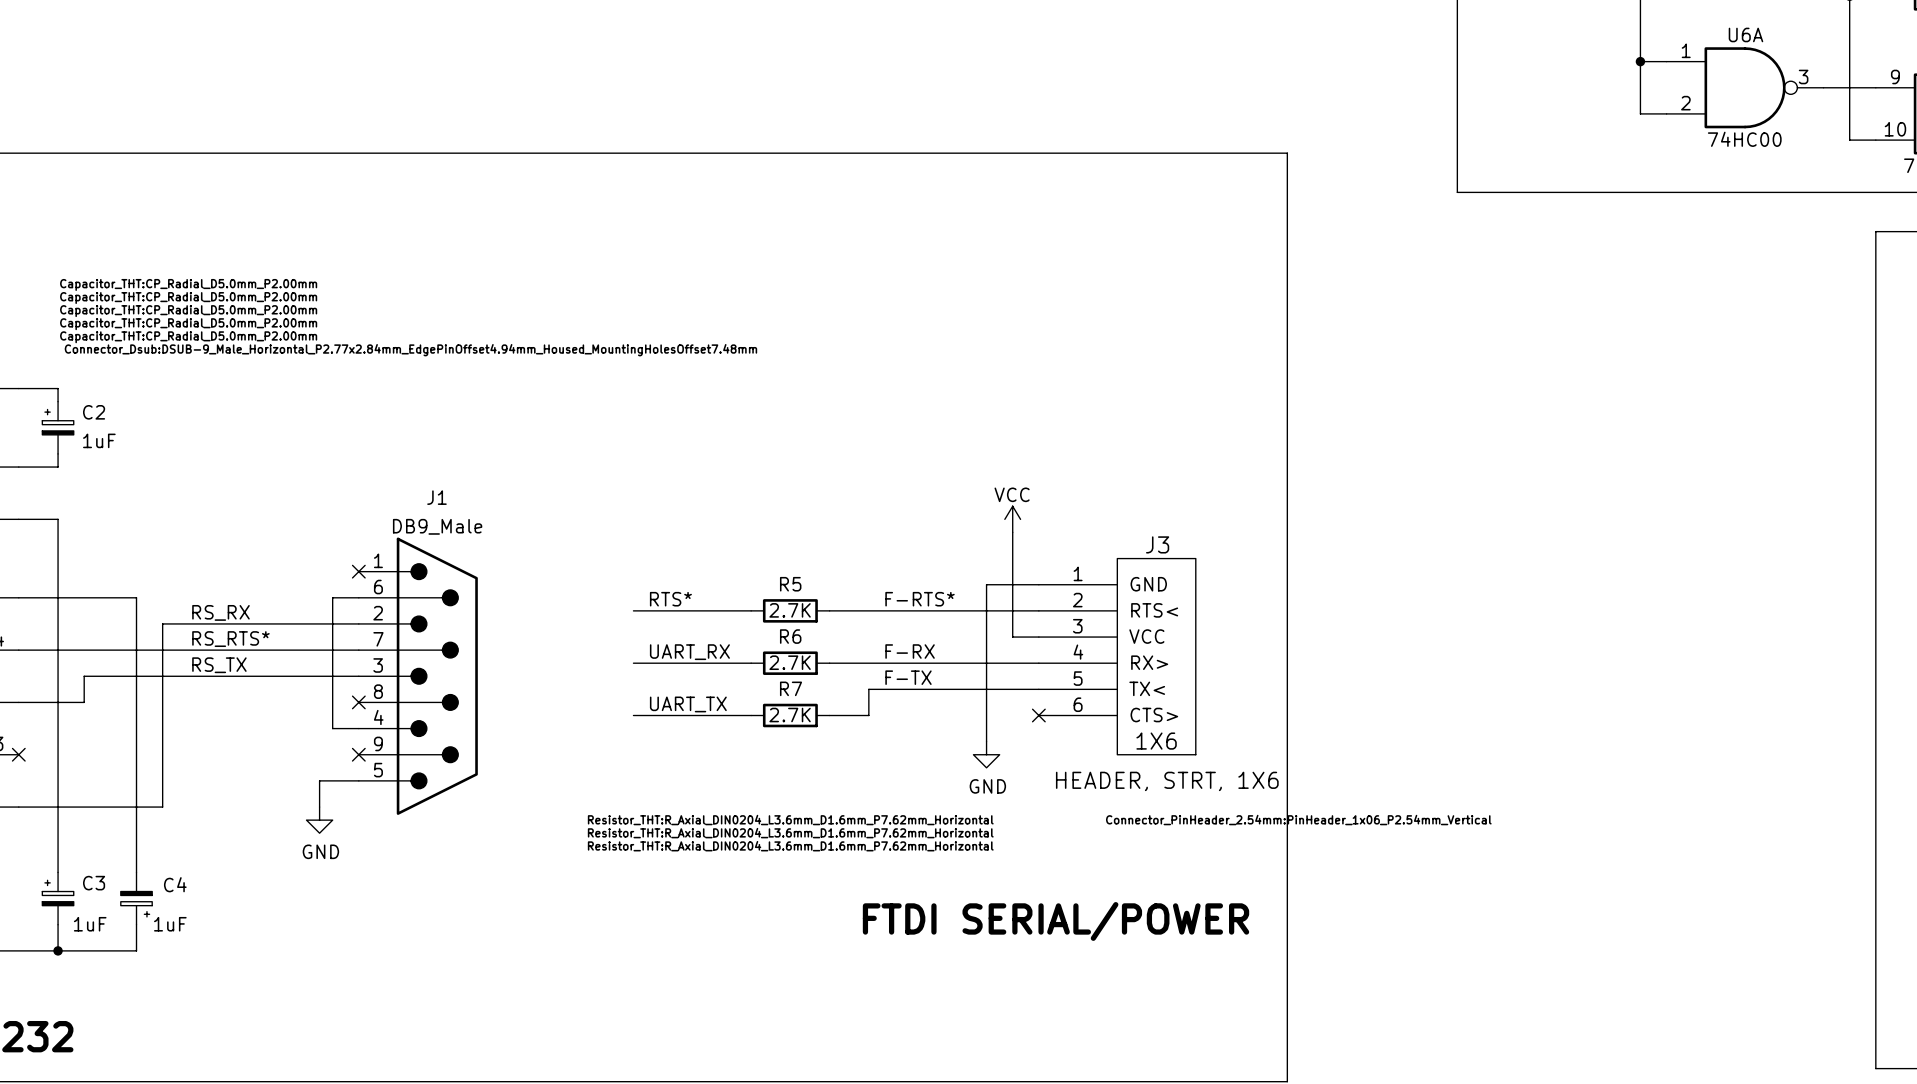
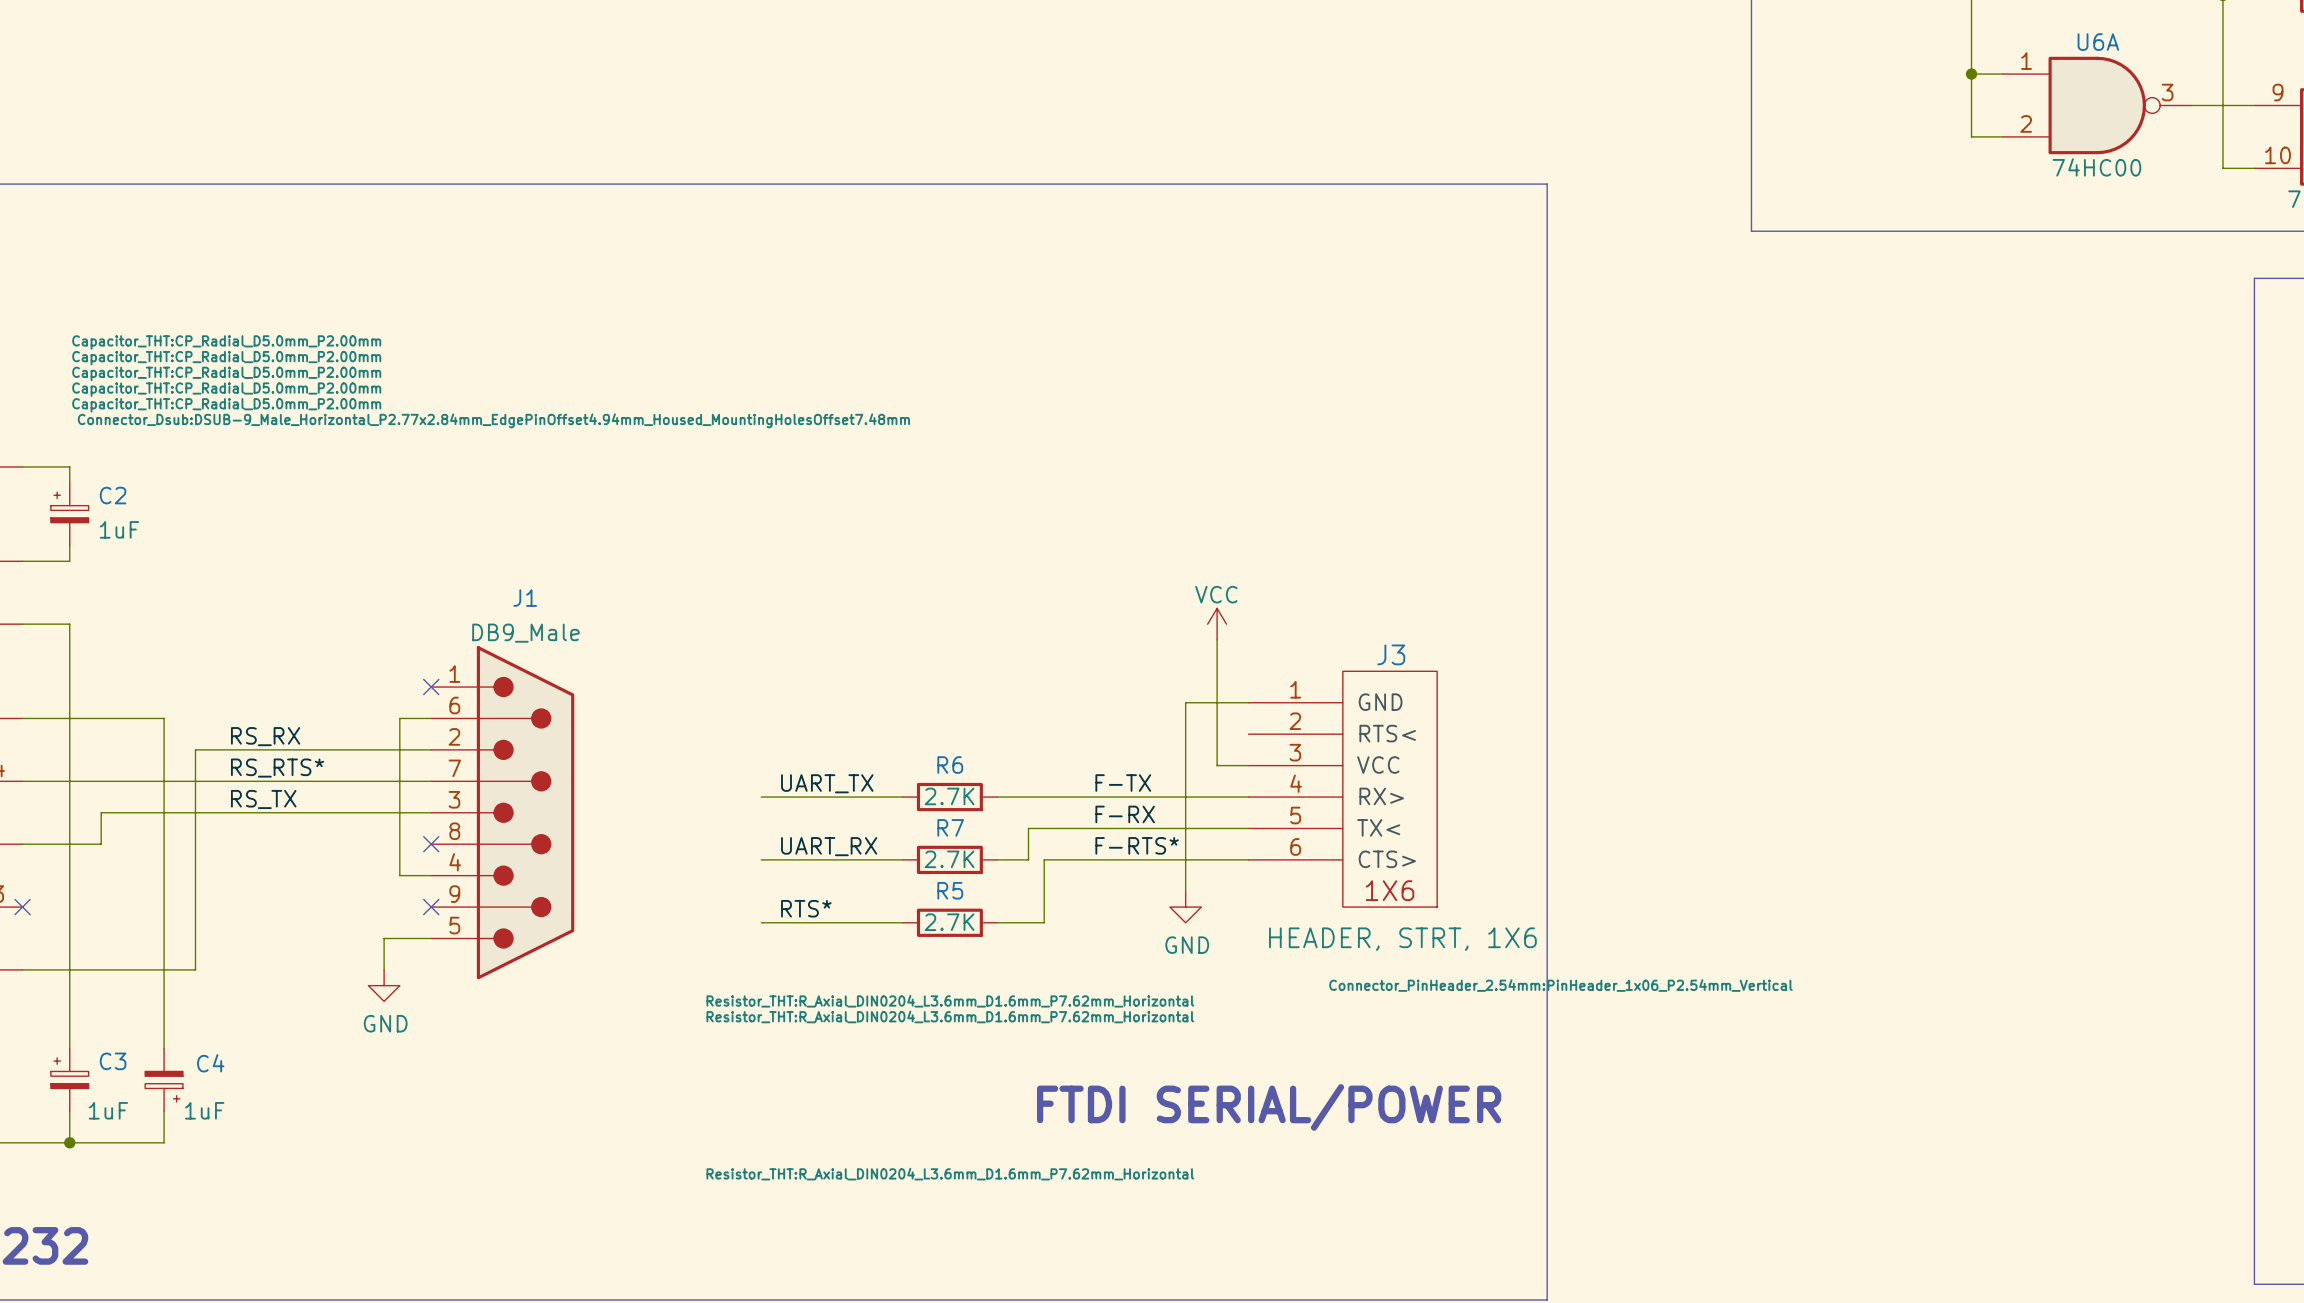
label position: RTS* (670, 599) -> RTS* (806, 908)
label position: F-RTS* (920, 599) -> F-RTS* (1137, 845)
wire: (633, 610) (751, 610) -> (761, 922) (902, 922)
R5 position: (790, 610) -> (949, 922)
wire: (829, 610) (1038, 610) -> none
label position: F-RX (910, 651) -> F-RX (1125, 814)
label: UART_RX (689, 652) -> UART_TX (827, 783)
label position: F-TX (908, 677) -> F-TX (1123, 783)
wire: (868, 689) (868, 715) (855, 715) -> (1044, 828) (1028, 828) (1028, 859)
label: UART_TX (688, 704) -> UART_RX (829, 846)
wire: none -> (1248, 859) (1044, 859) (1044, 922) (997, 922)
no-connect mark: (1038, 715) -> none

